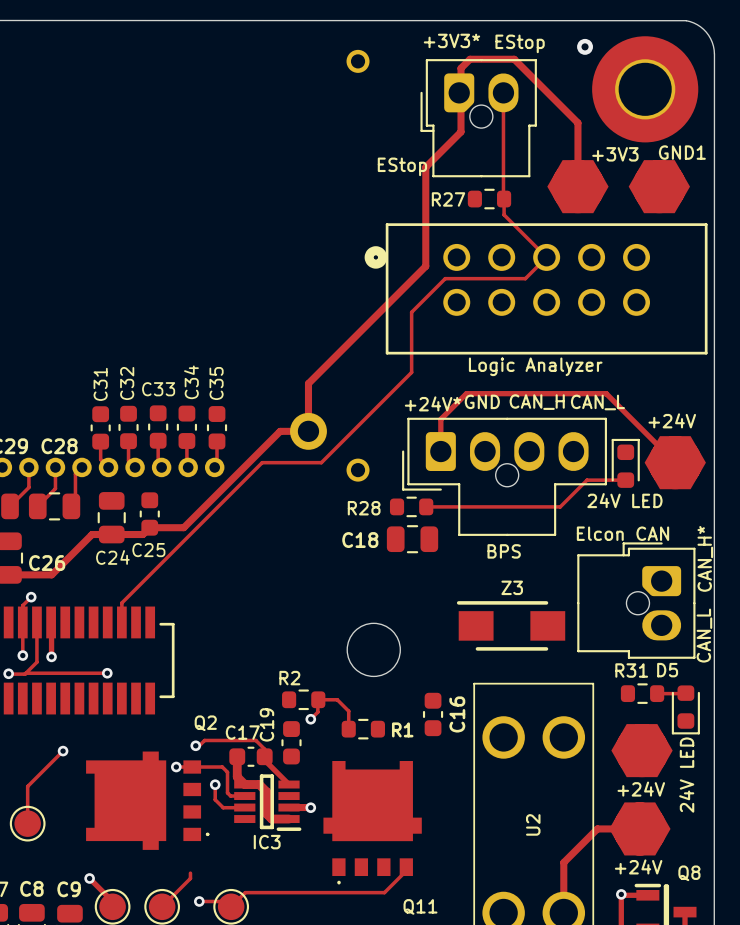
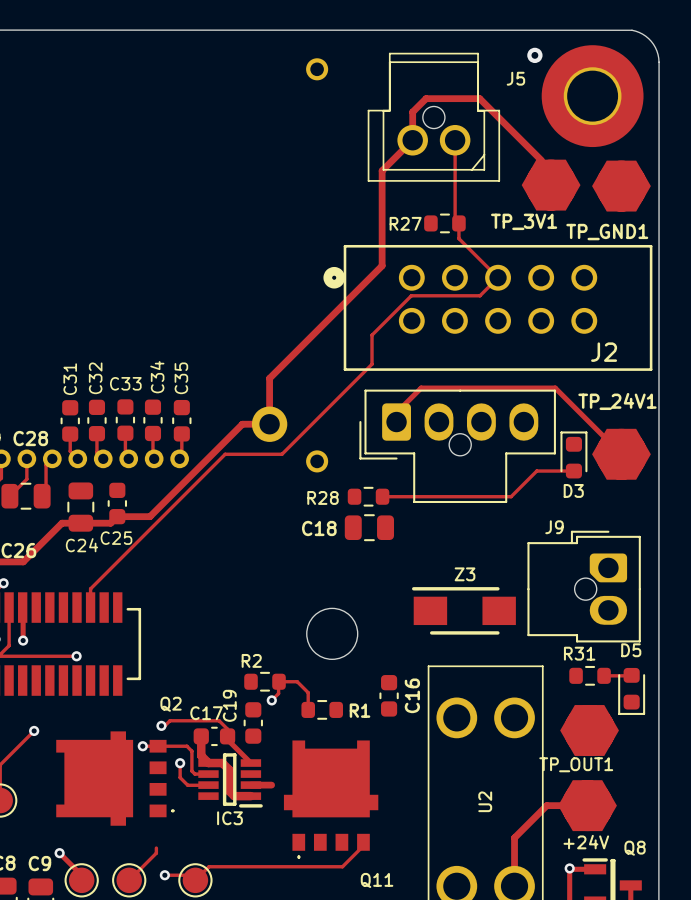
text: +3V3* (451, 40) -> none
text: EStop (520, 43) -> none
track: (503, 92) (504, 214) (546, 257) (525, 278) (445, 278) (411, 312) (411, 372) -> (455, 140) (455, 219) (458, 223) (458, 238) (498, 277) (480, 295) (411, 295) (372, 335) (372, 364) (368, 367)
J5: none -> (433, 117)
part: (478, 118) -> none
track: (457, 135) (461, 131) (461, 68) (470, 59) (514, 59) (577, 122) (577, 186) -> (412, 140) (412, 112) (426, 98) (479, 98) (541, 160)
GND1 name: GND1 (682, 152) -> TP_GND1 (607, 232)
text: EStop (402, 166) -> none
TP_3V1: none -> (551, 185)
+3V3: (577, 186) -> none
GND1 position: (659, 186) -> (621, 186)
R27 position: (489, 199) -> (444, 223)
part: (536, 288) -> none
J2: none -> (487, 307)
text: Logic Analyzer (535, 366) -> none
text: GND (482, 401) -> none
text: CAN_H (537, 402) -> none
text: CAN_L (597, 402) -> none
text: +24V* (433, 403) -> none
TP_24V1 name: none -> TP_24V1 (617, 401)
text: +24V (672, 420) -> none
part position: (504, 476) -> (457, 446)
24V LED name: 24V LED (624, 500) -> D3 (573, 490)
text: Elcon CAN (623, 533) -> none
J9 name: none -> J9 (554, 527)
text: BPS (504, 551) -> none
text: CAN_H* (705, 558) -> none
text: CAN_L (704, 635) -> none
D5 name position: D5 (667, 670) -> D5 (631, 650)
text: 24V LED (686, 775) -> none
TP_OUT1 name: none -> TP_OUT1 (576, 764)
text: +24V (641, 789) -> none
via: (310, 807) -> none

